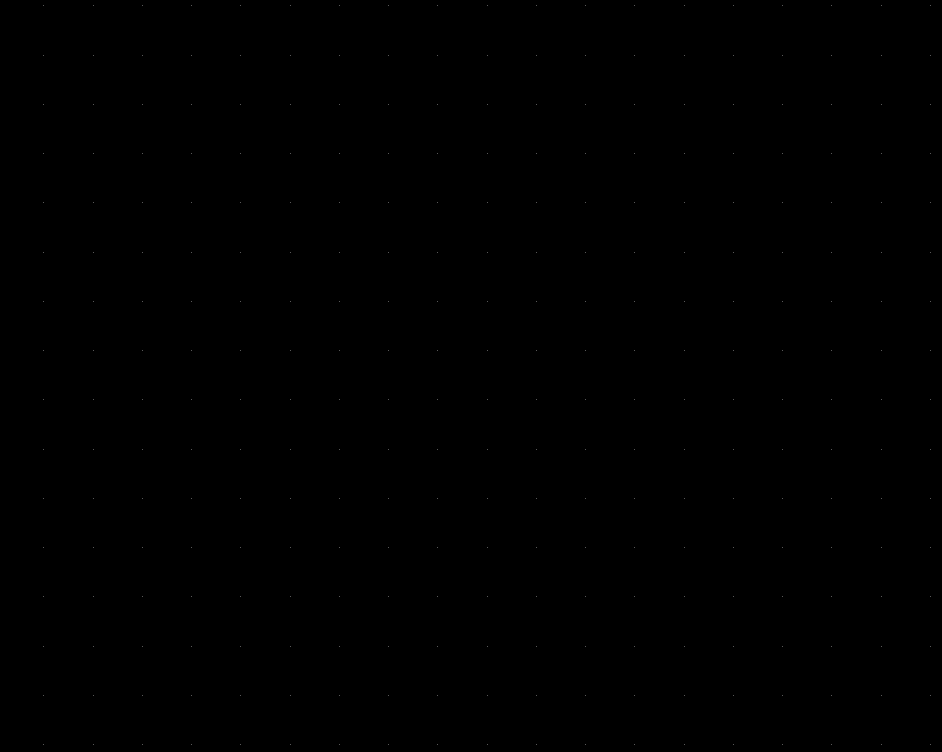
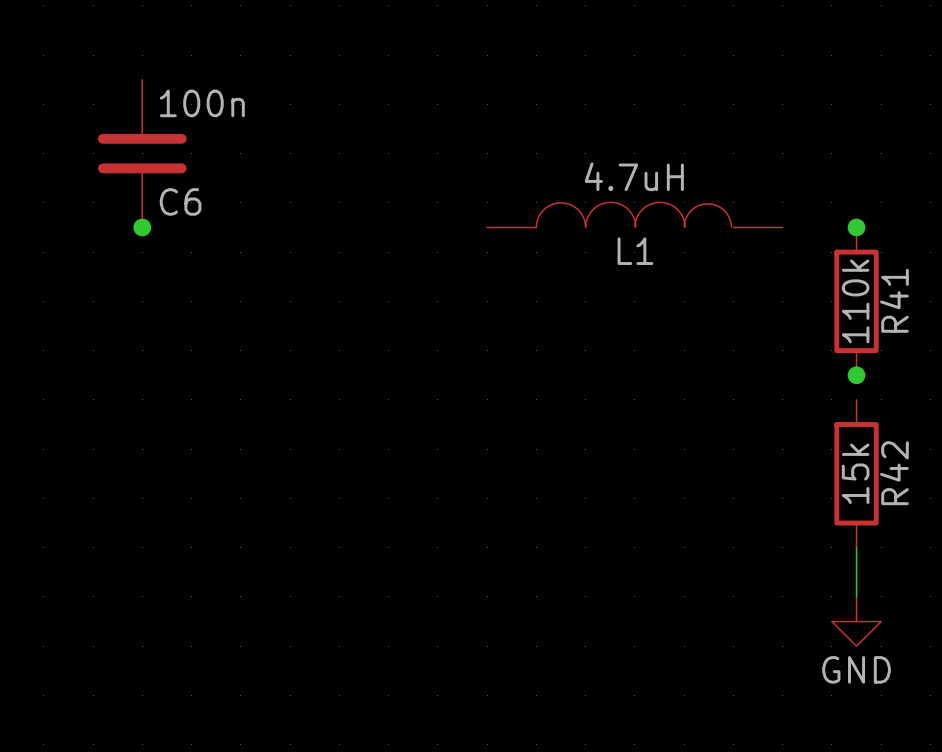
C6: none -> 100n (142, 153)
L1: none -> 4.7uH (634, 214)
junction: none -> (142, 227)
junction: none -> (856, 227)
R41: none -> 110k (856, 301)
junction: none -> (856, 375)
R42: none -> 15k (856, 473)
wire: none -> (856, 547) (856, 596)
power symbol: none -> GND (856, 621)

